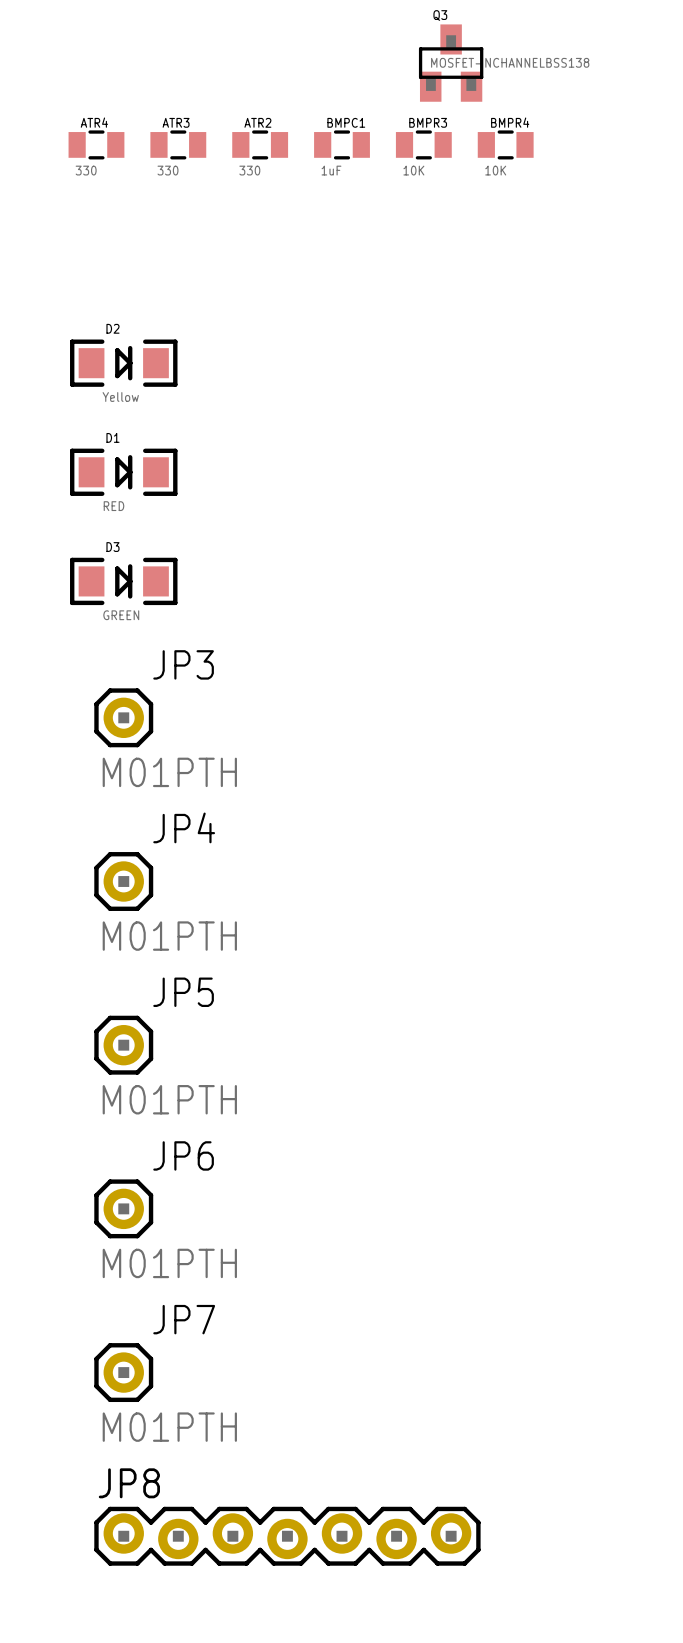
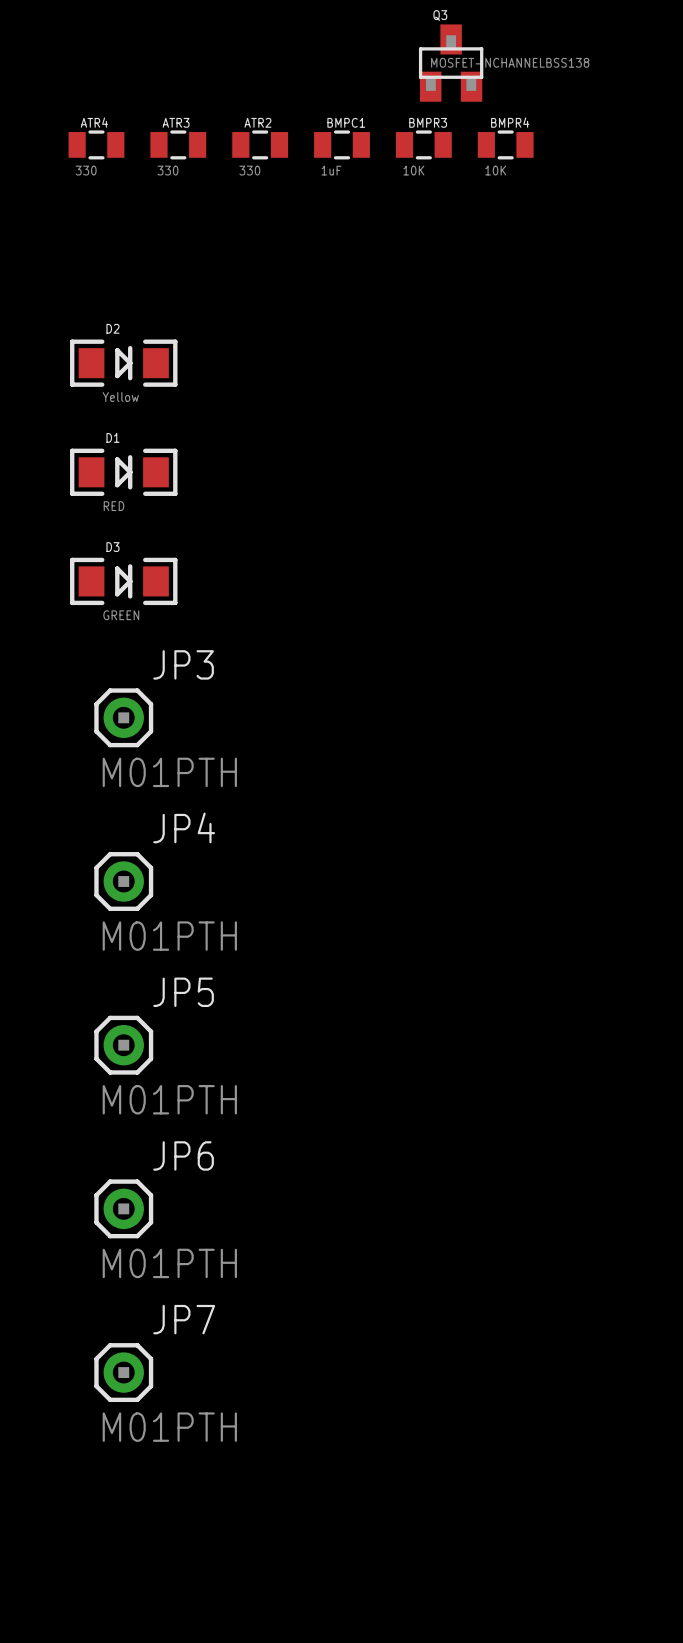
JP8: (287, 1536) -> none

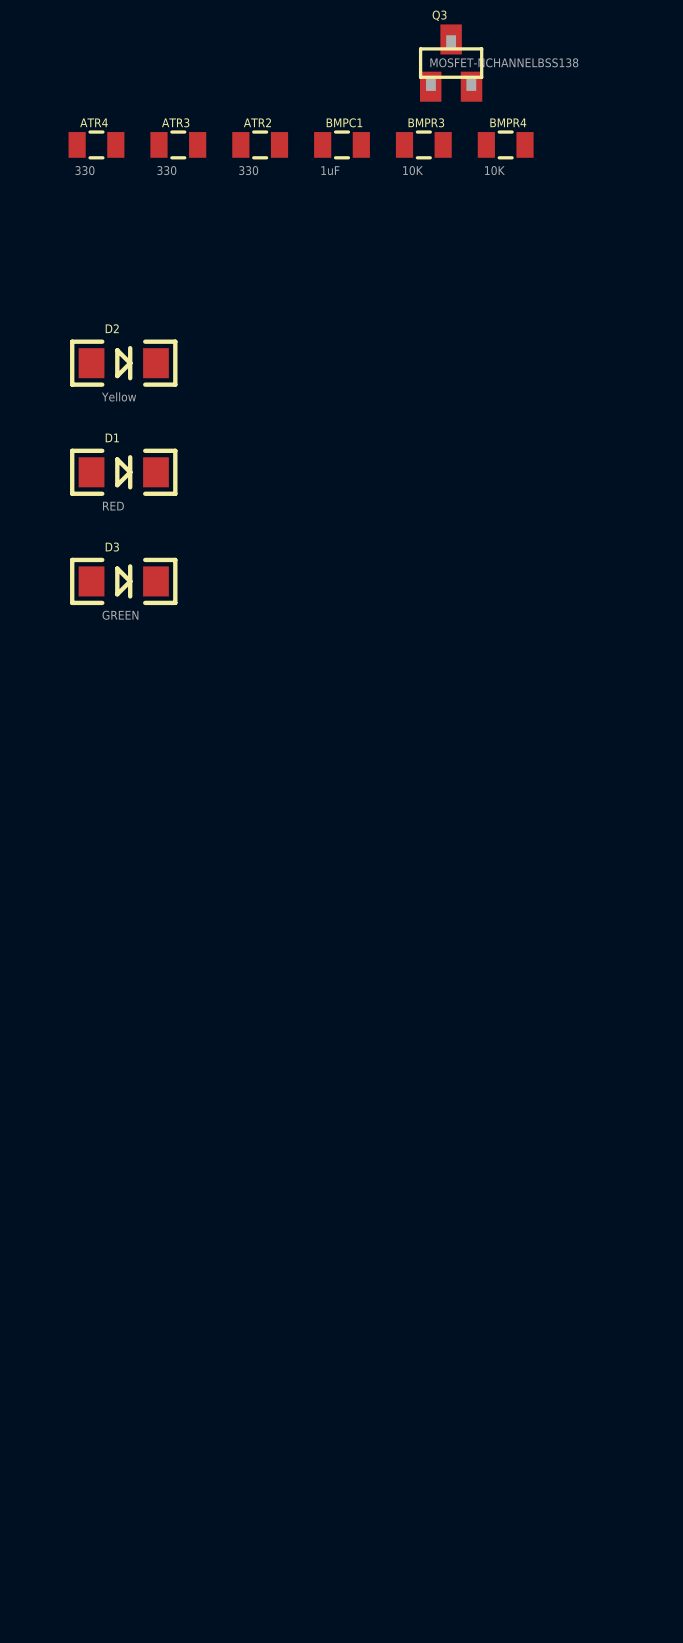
JP3: M01PTH (123, 717) -> none
JP4: M01PTH (123, 881) -> none
JP5: M01PTH (123, 1045) -> none
JP6: M01PTH (123, 1208) -> none
JP7: M01PTH (123, 1372) -> none

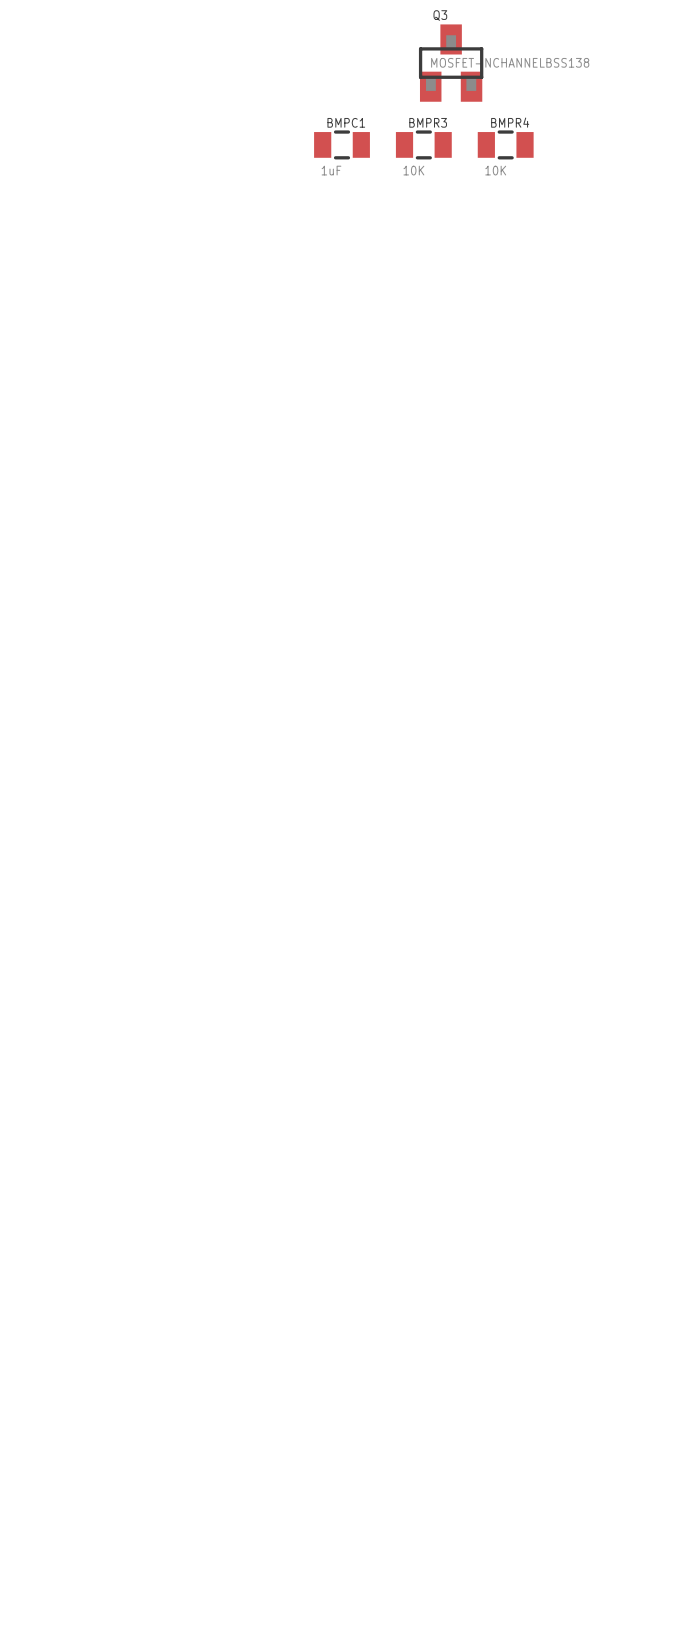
ATR4: 330 (96, 144) -> none
ATR3: 330 (178, 144) -> none
ATR2: 330 (260, 144) -> none
D2: Yellow (123, 363) -> none
D1: RED (123, 472) -> none
D3: GREEN (123, 581) -> none

